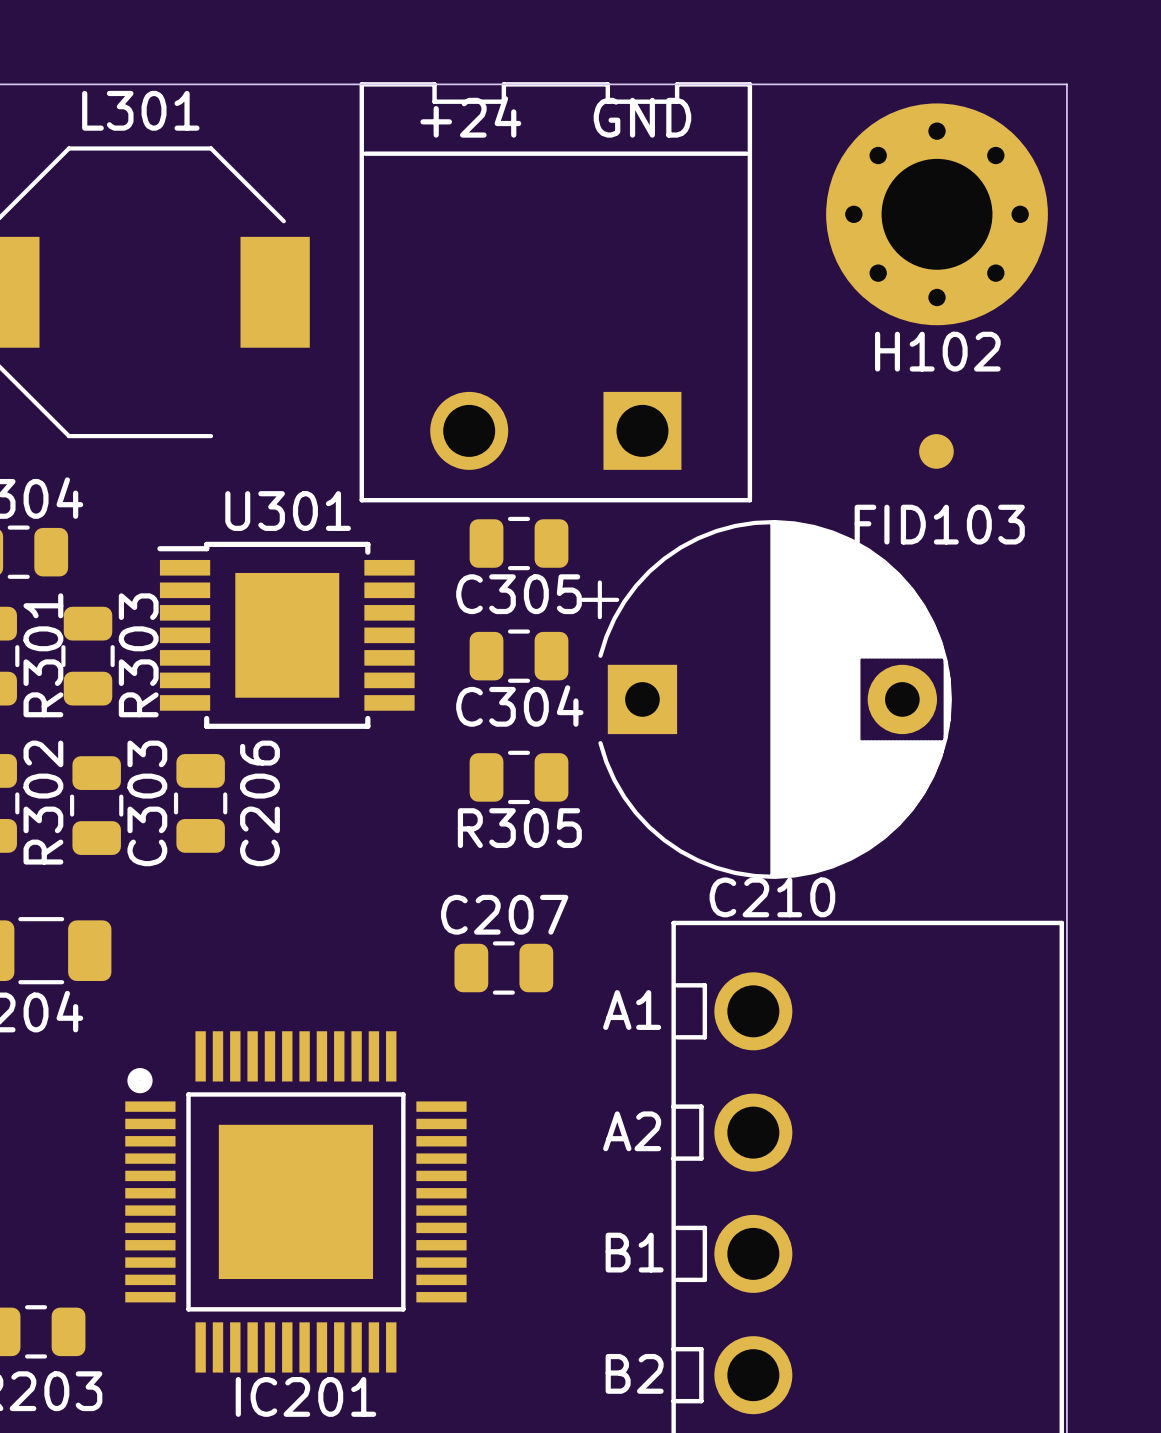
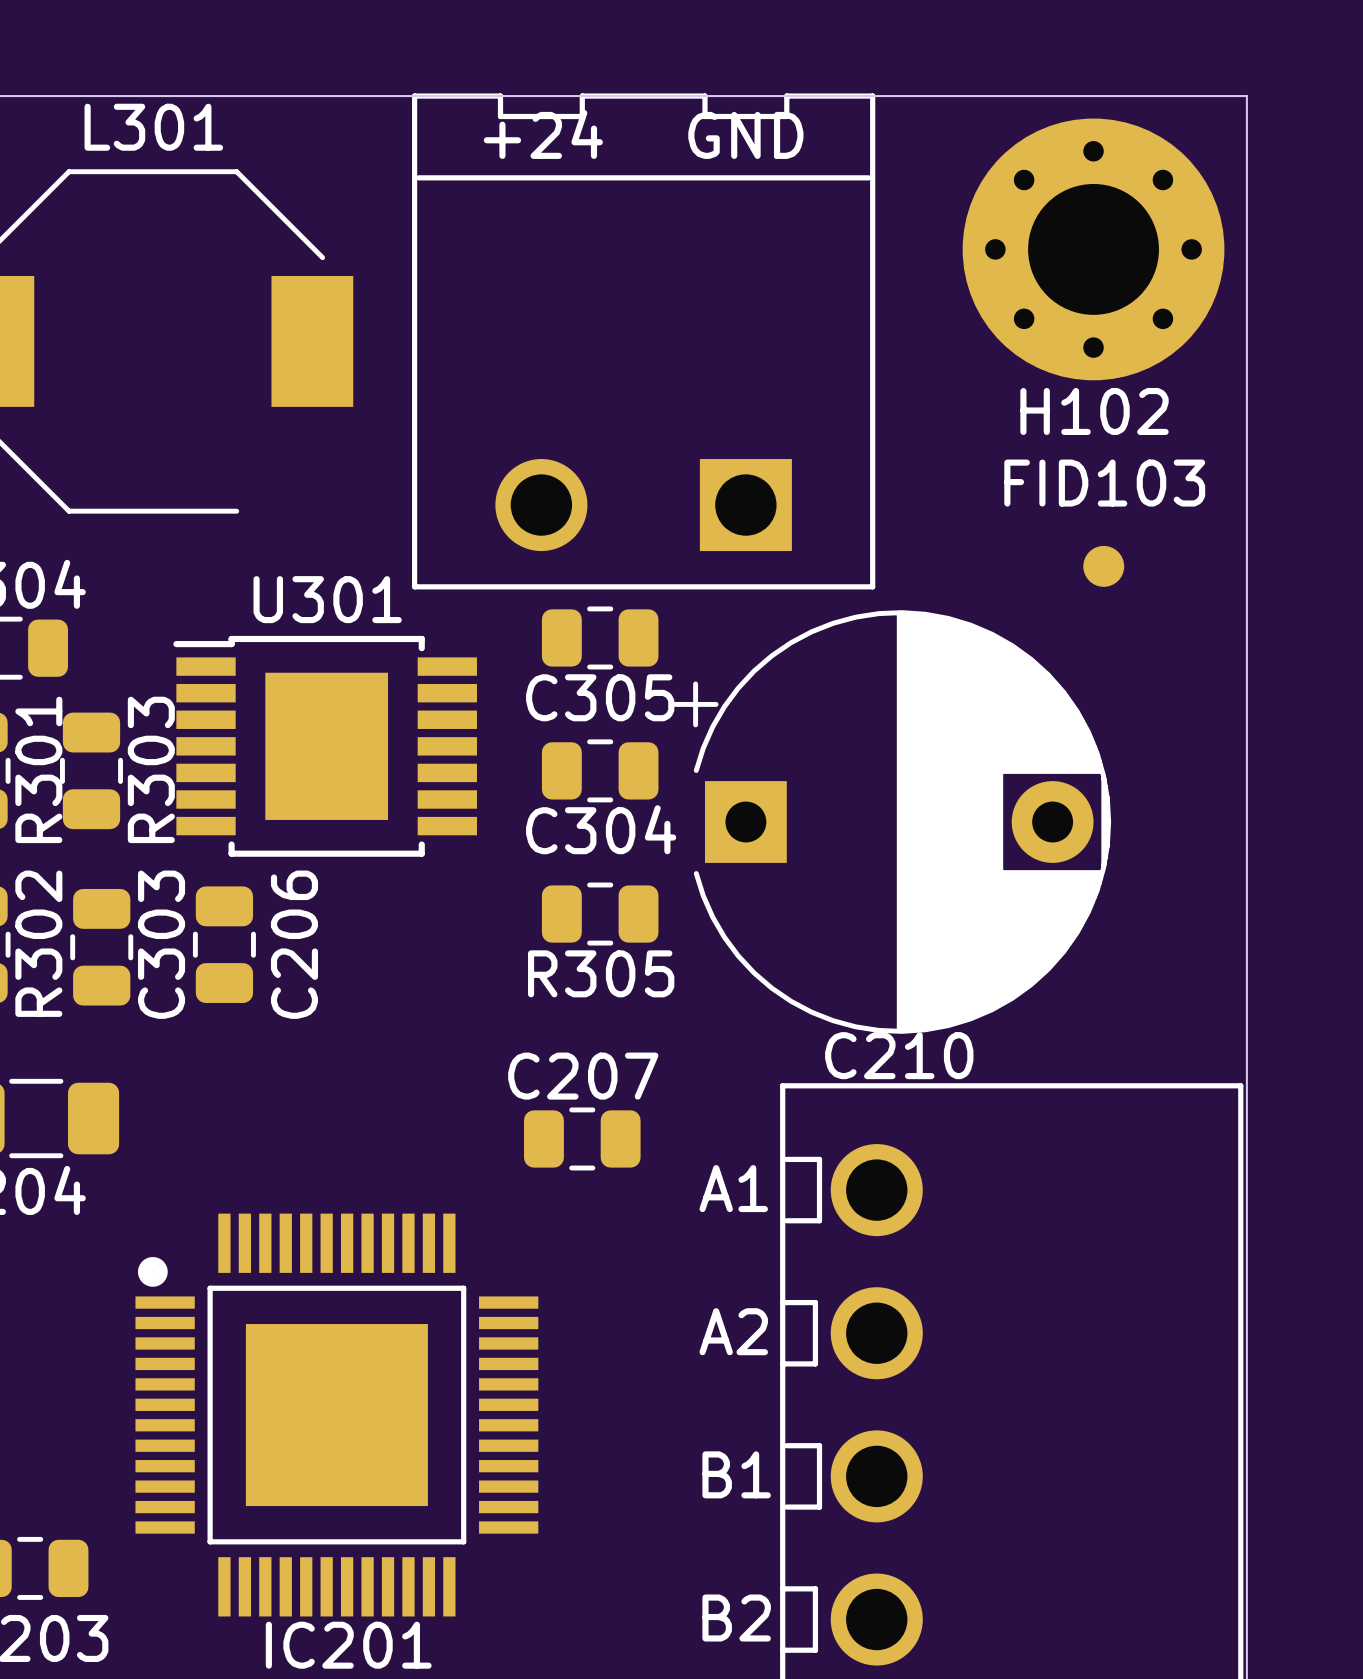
FID103 position: (936, 451) -> (1103, 566)
FID103 name position: FID103 (939, 524) -> FID103 (1104, 483)

